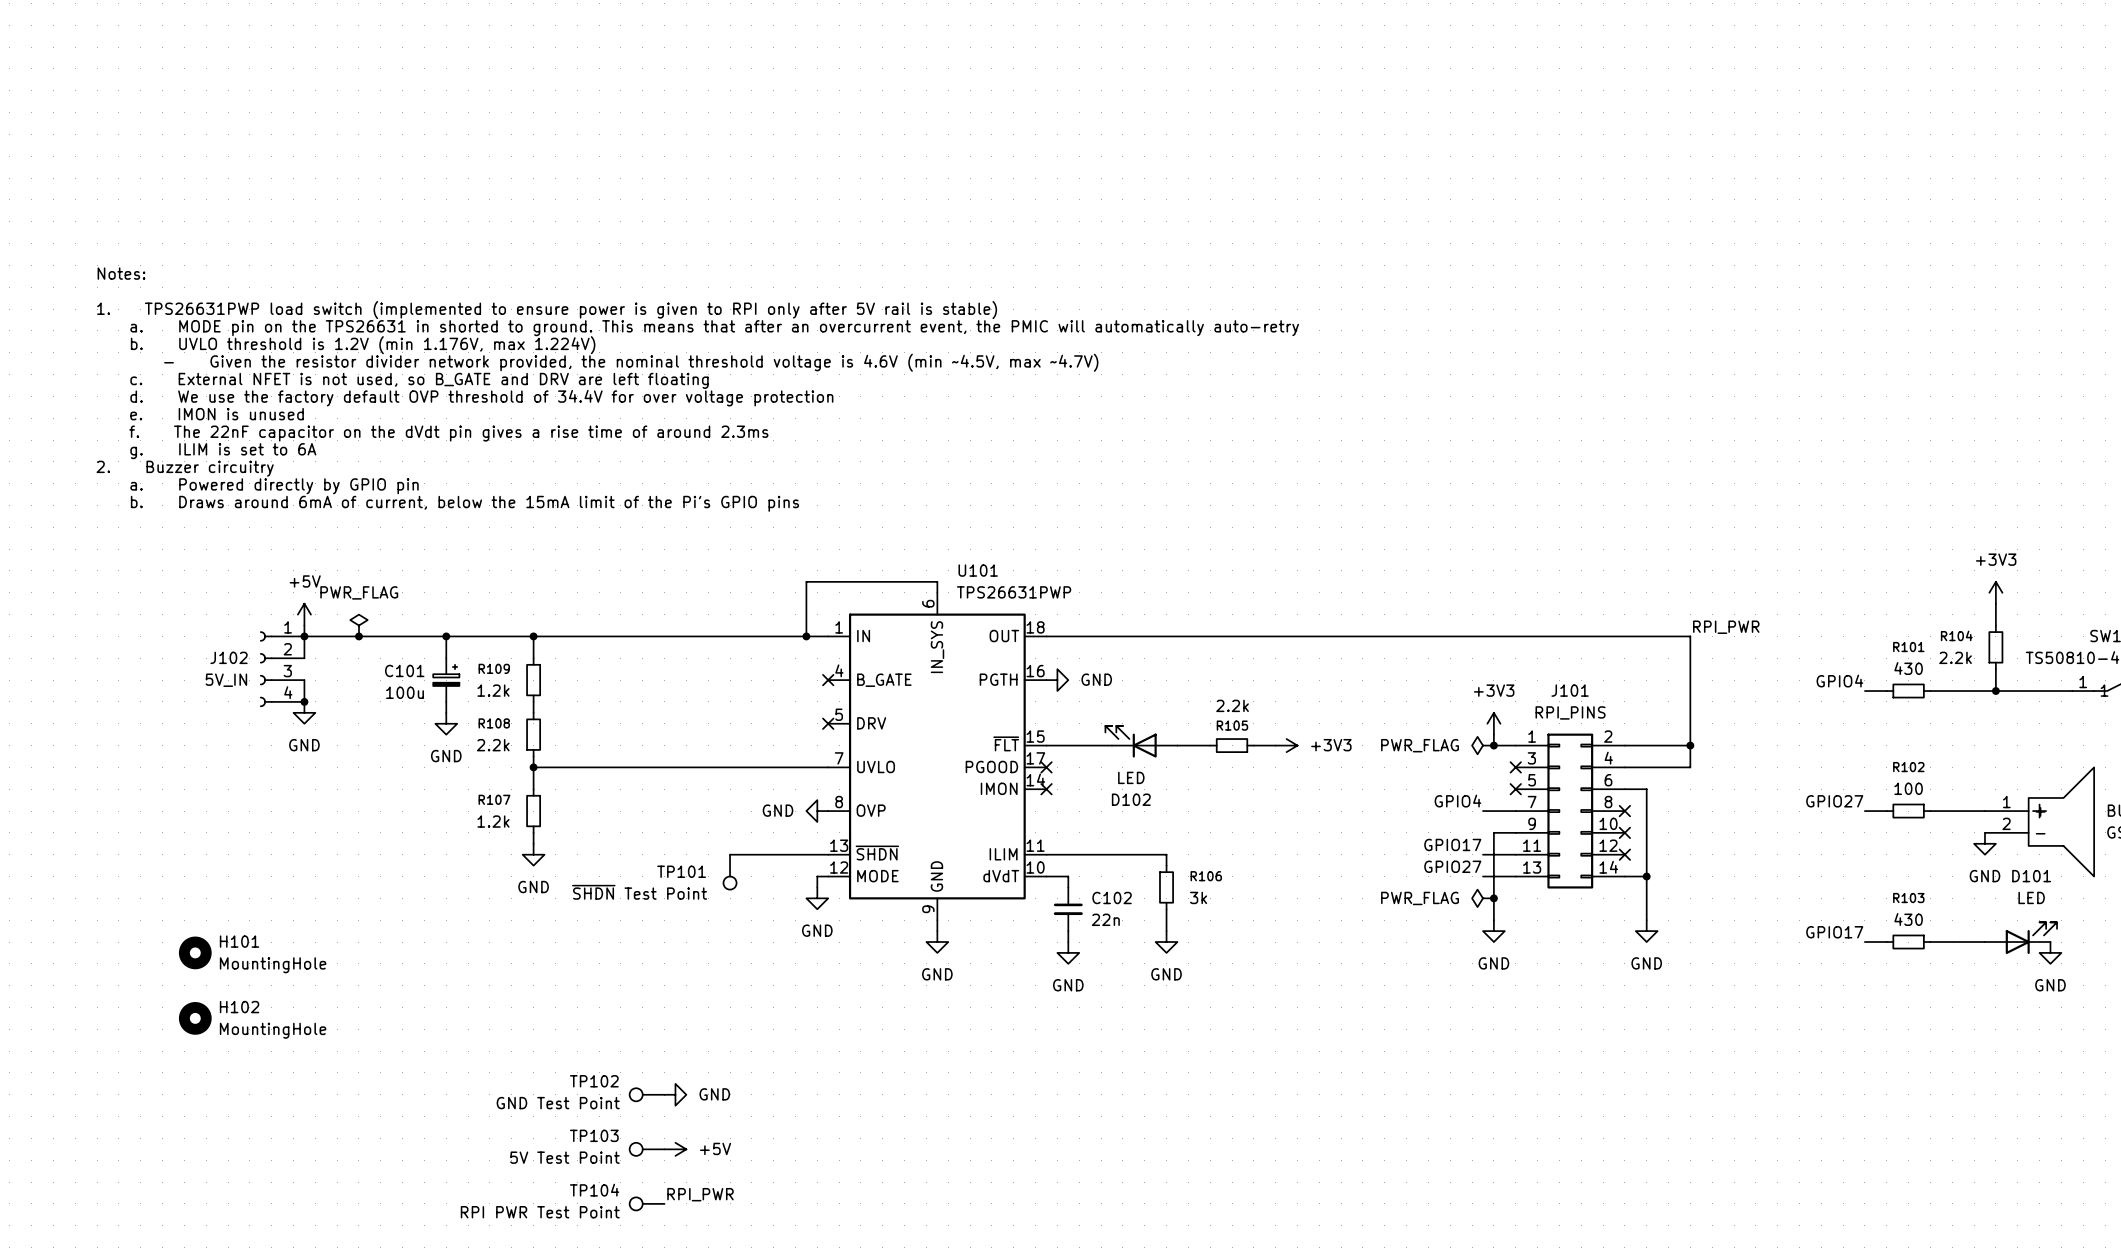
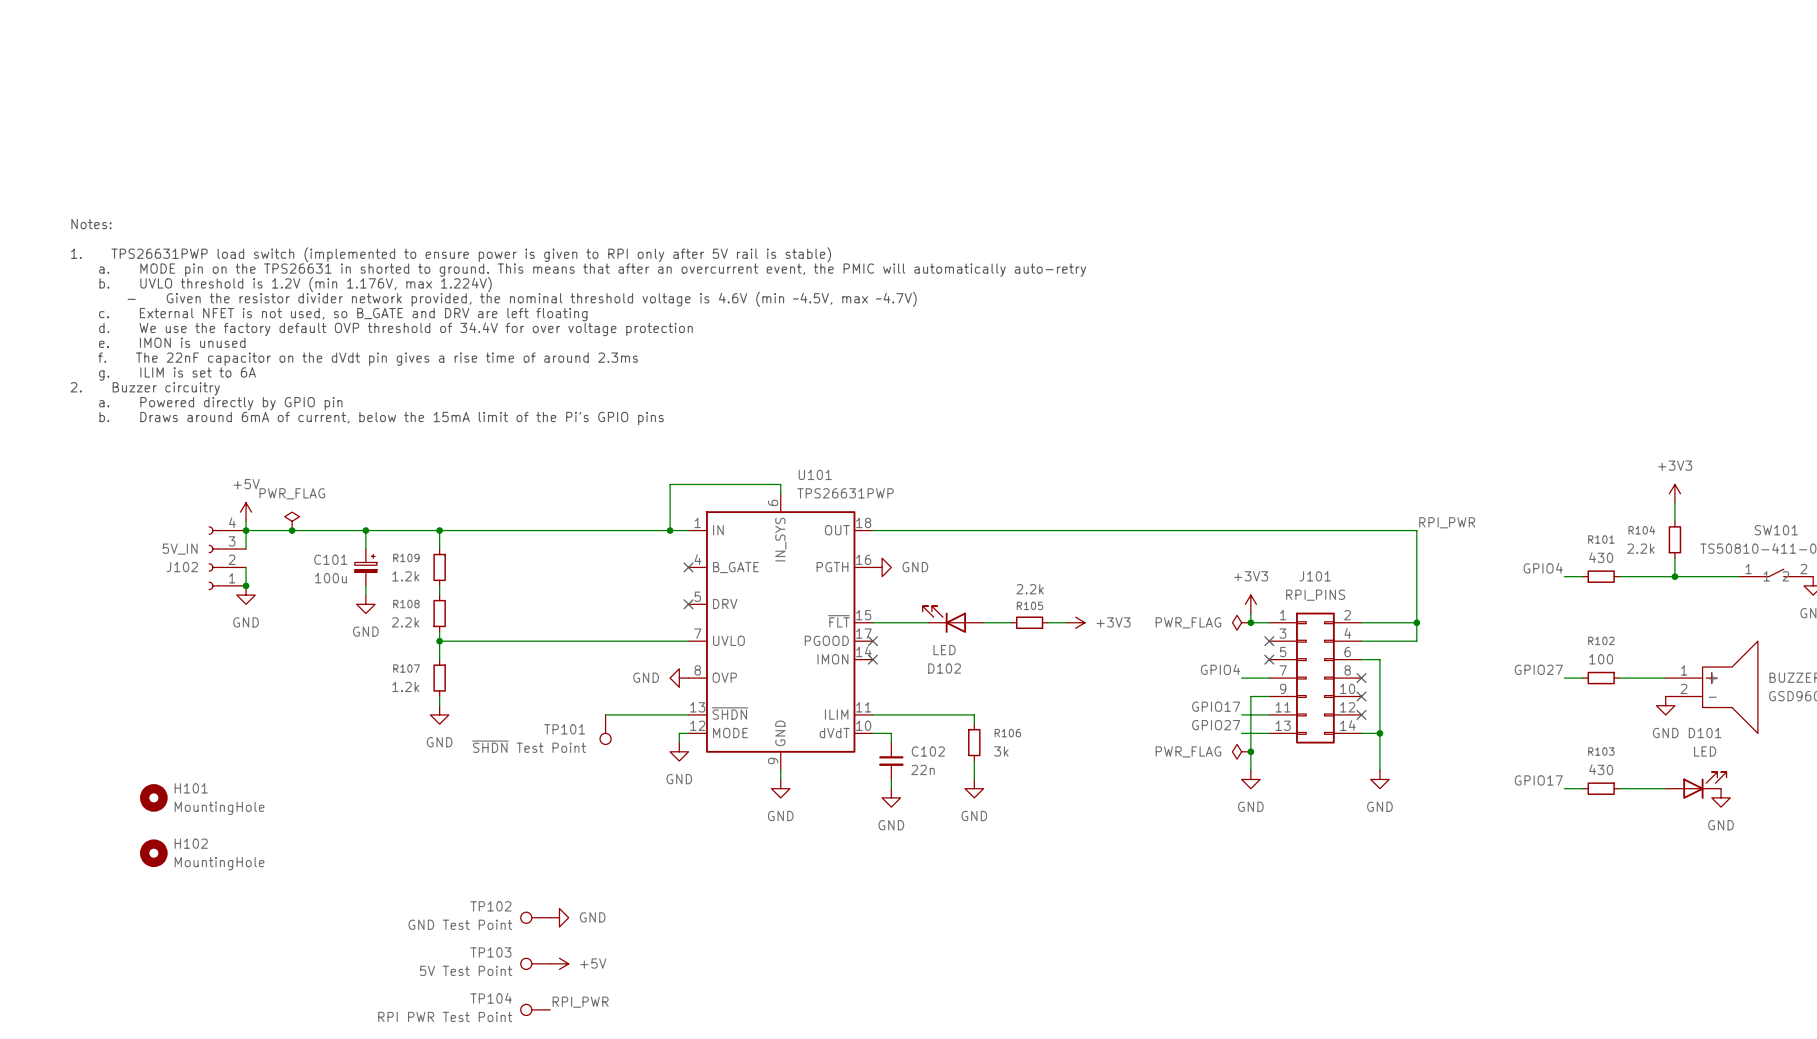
J102 flip: as is (266, 669) -> up-down (213, 558)

